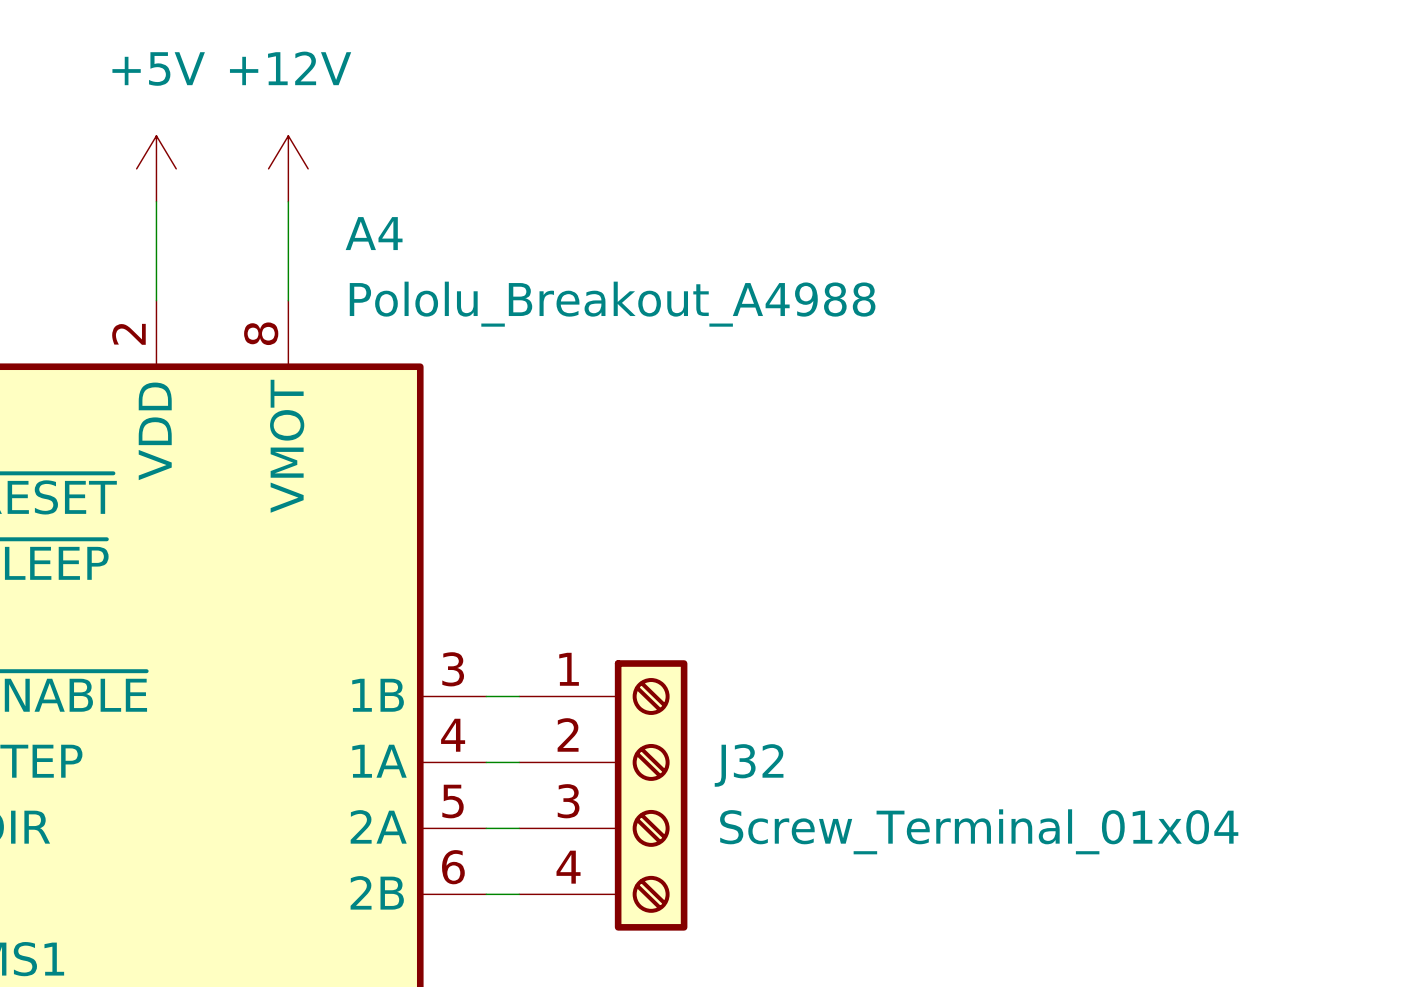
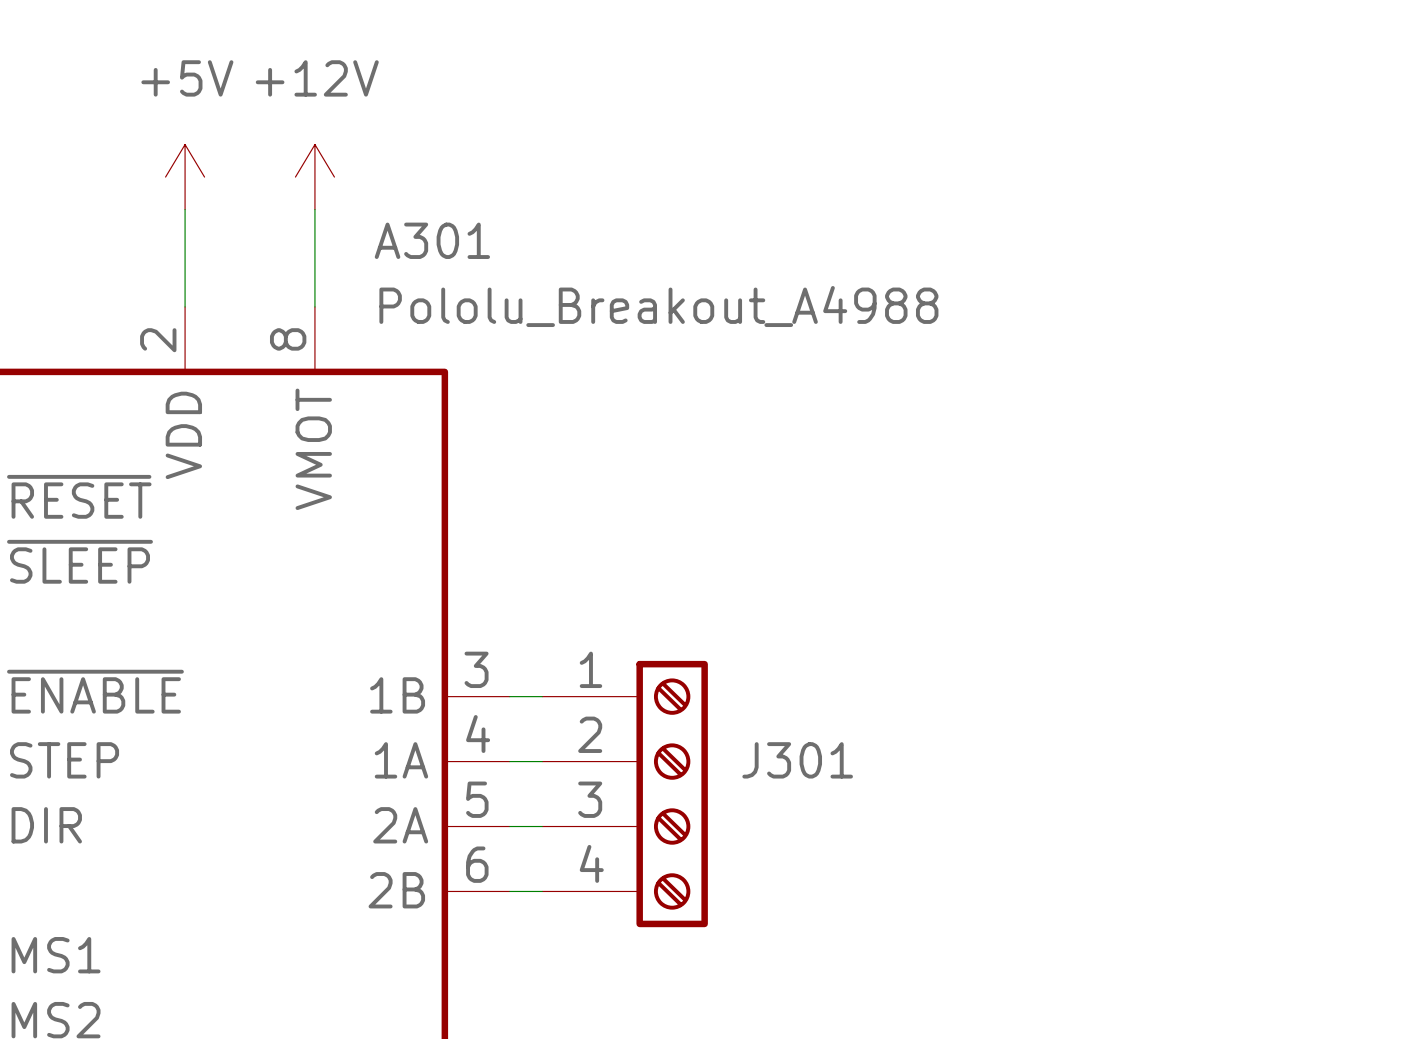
A4 name: A4 (374, 233) -> A301 (432, 240)
J32 name: J32 (749, 765) -> J301 (797, 760)
J32 value: Screw_Terminal_01x04 (979, 831) -> none

